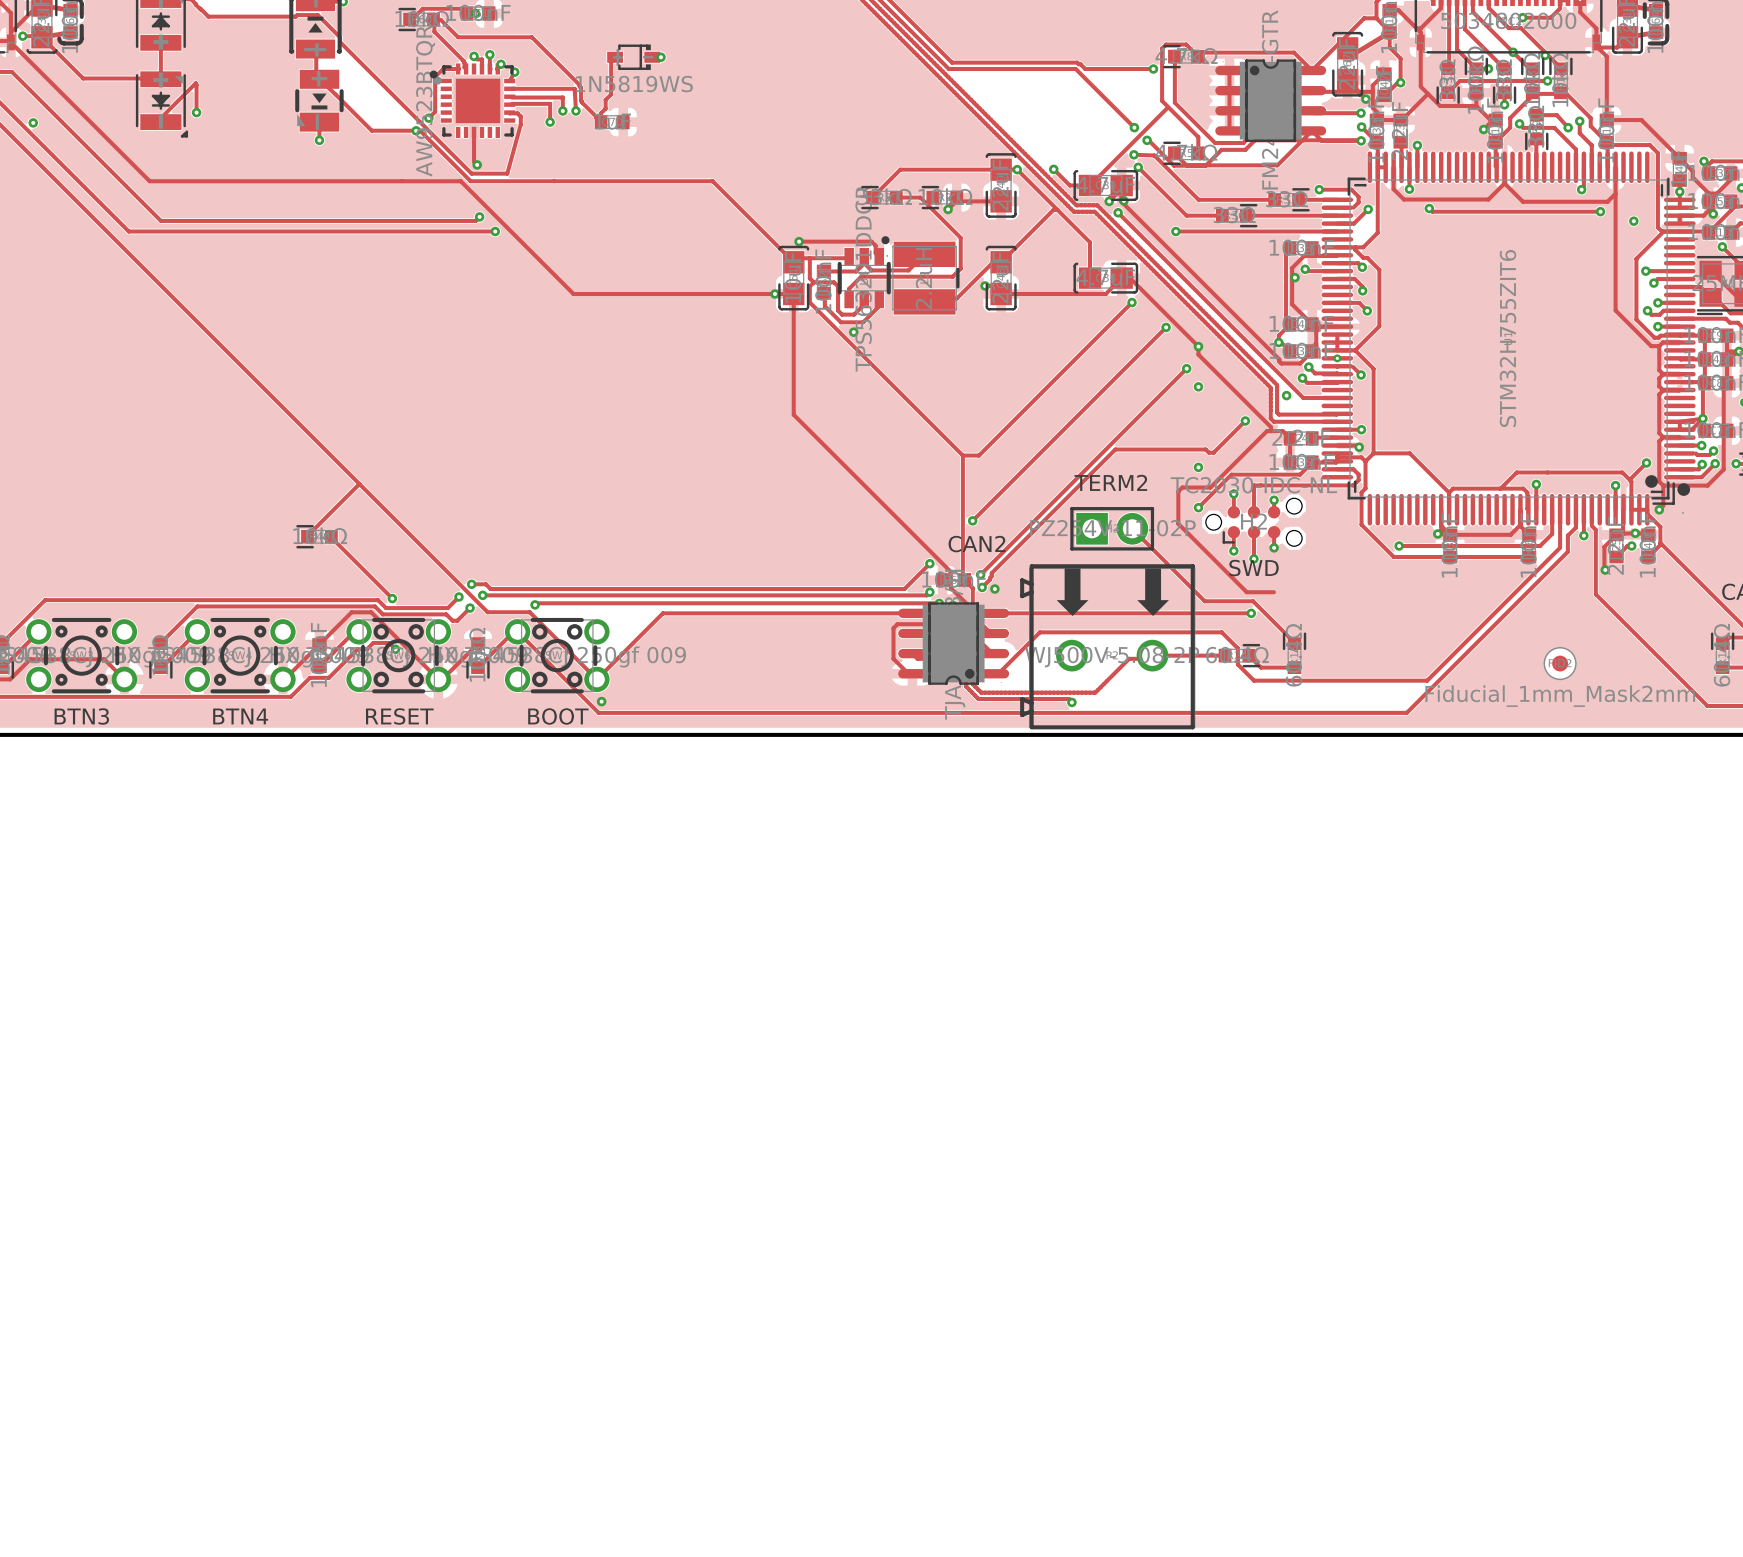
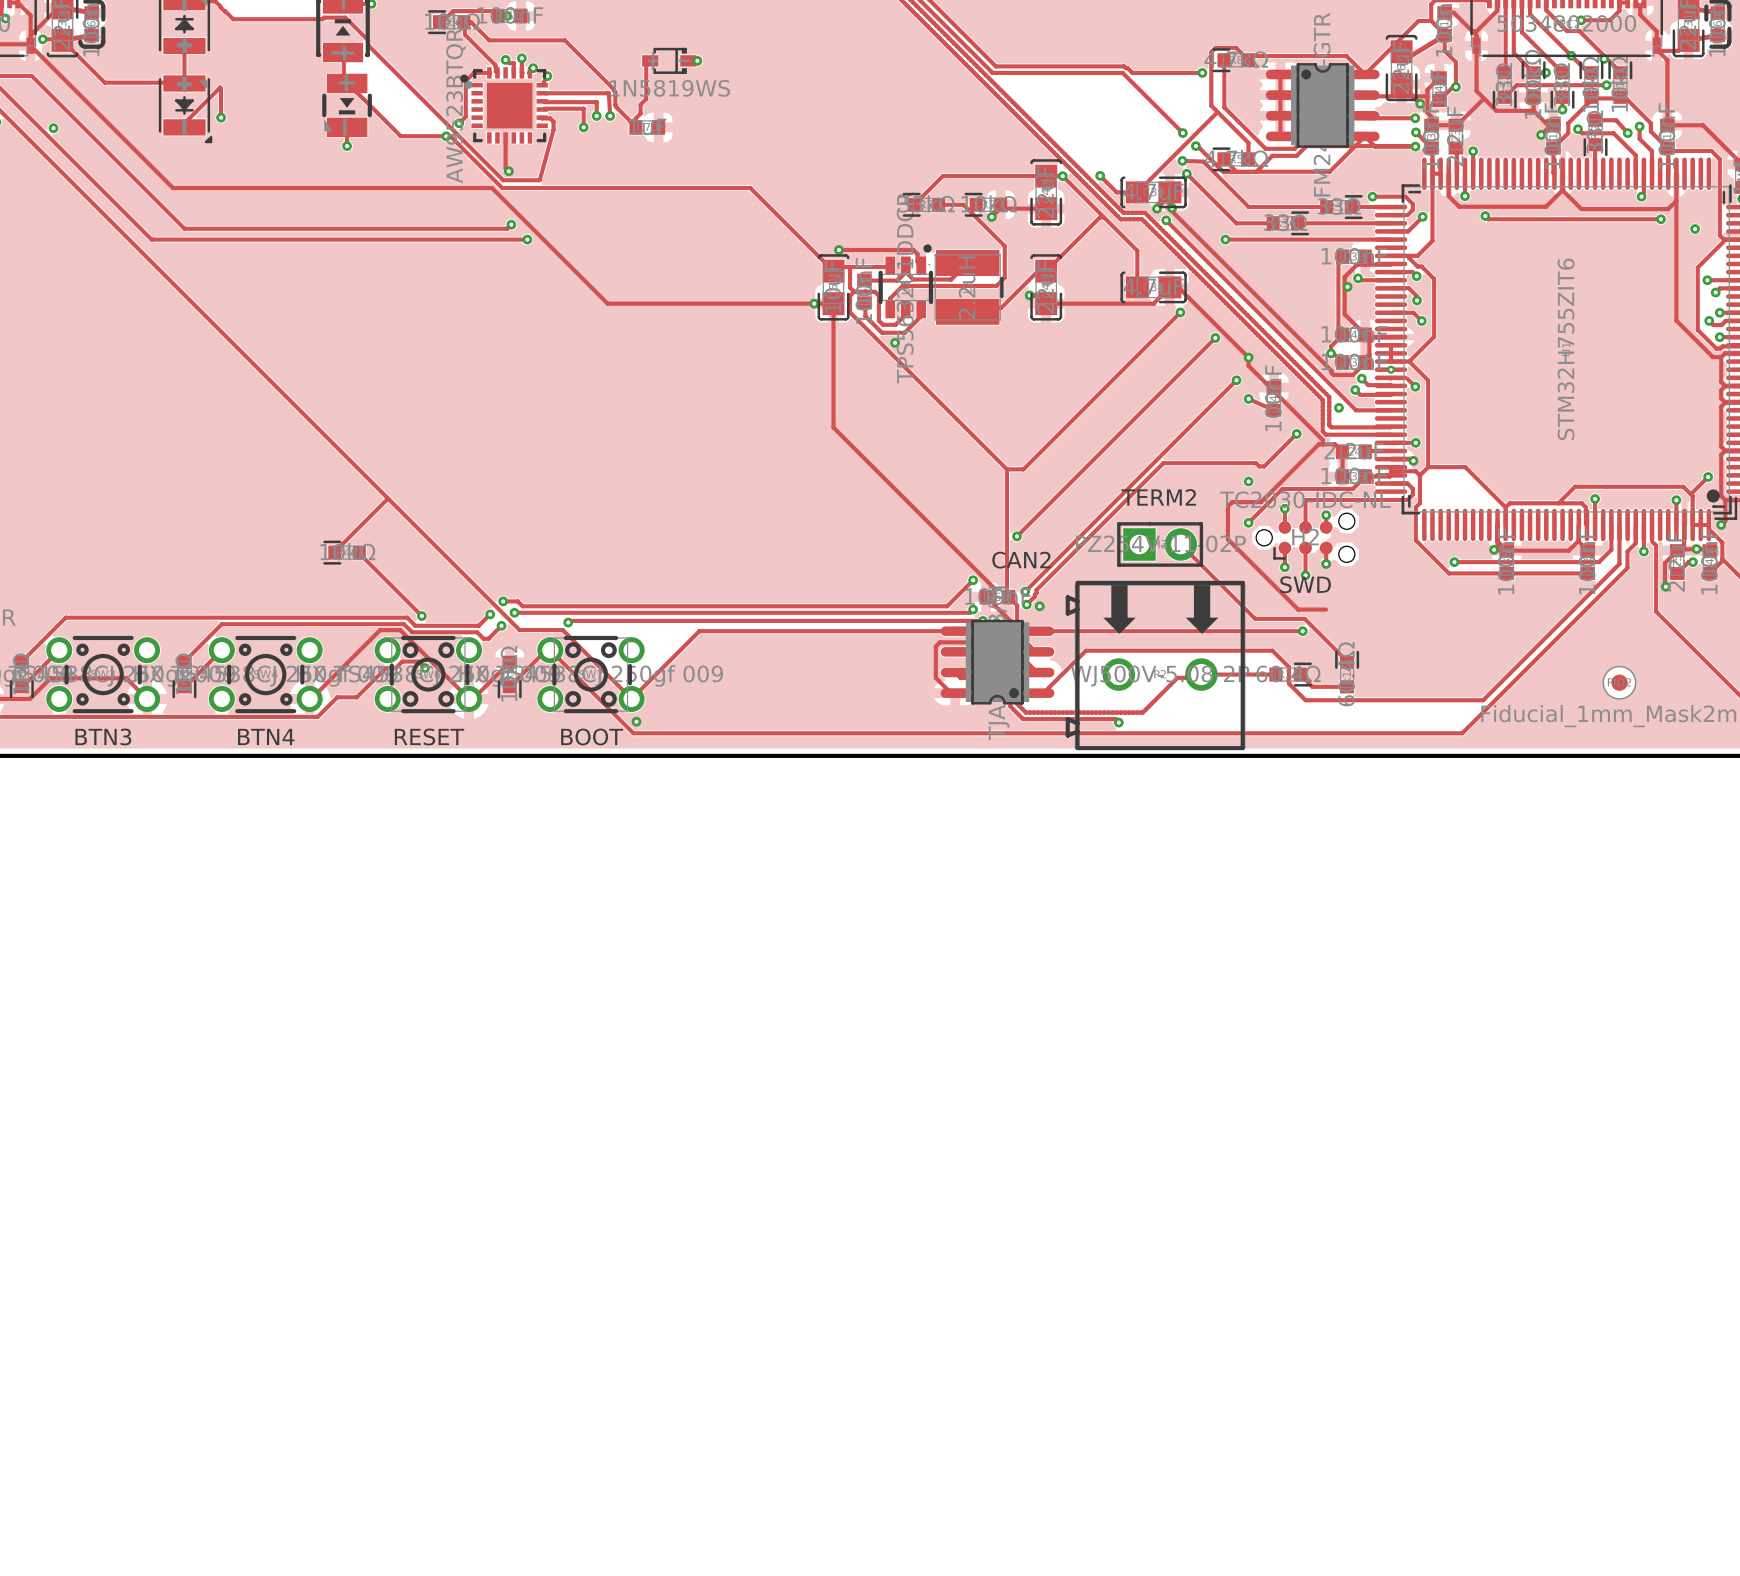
track: none -> (1248, 398) (1273, 410)
track: (354, 631) (319, 666) -> none
part position: (319, 655) -> (1273, 398)

